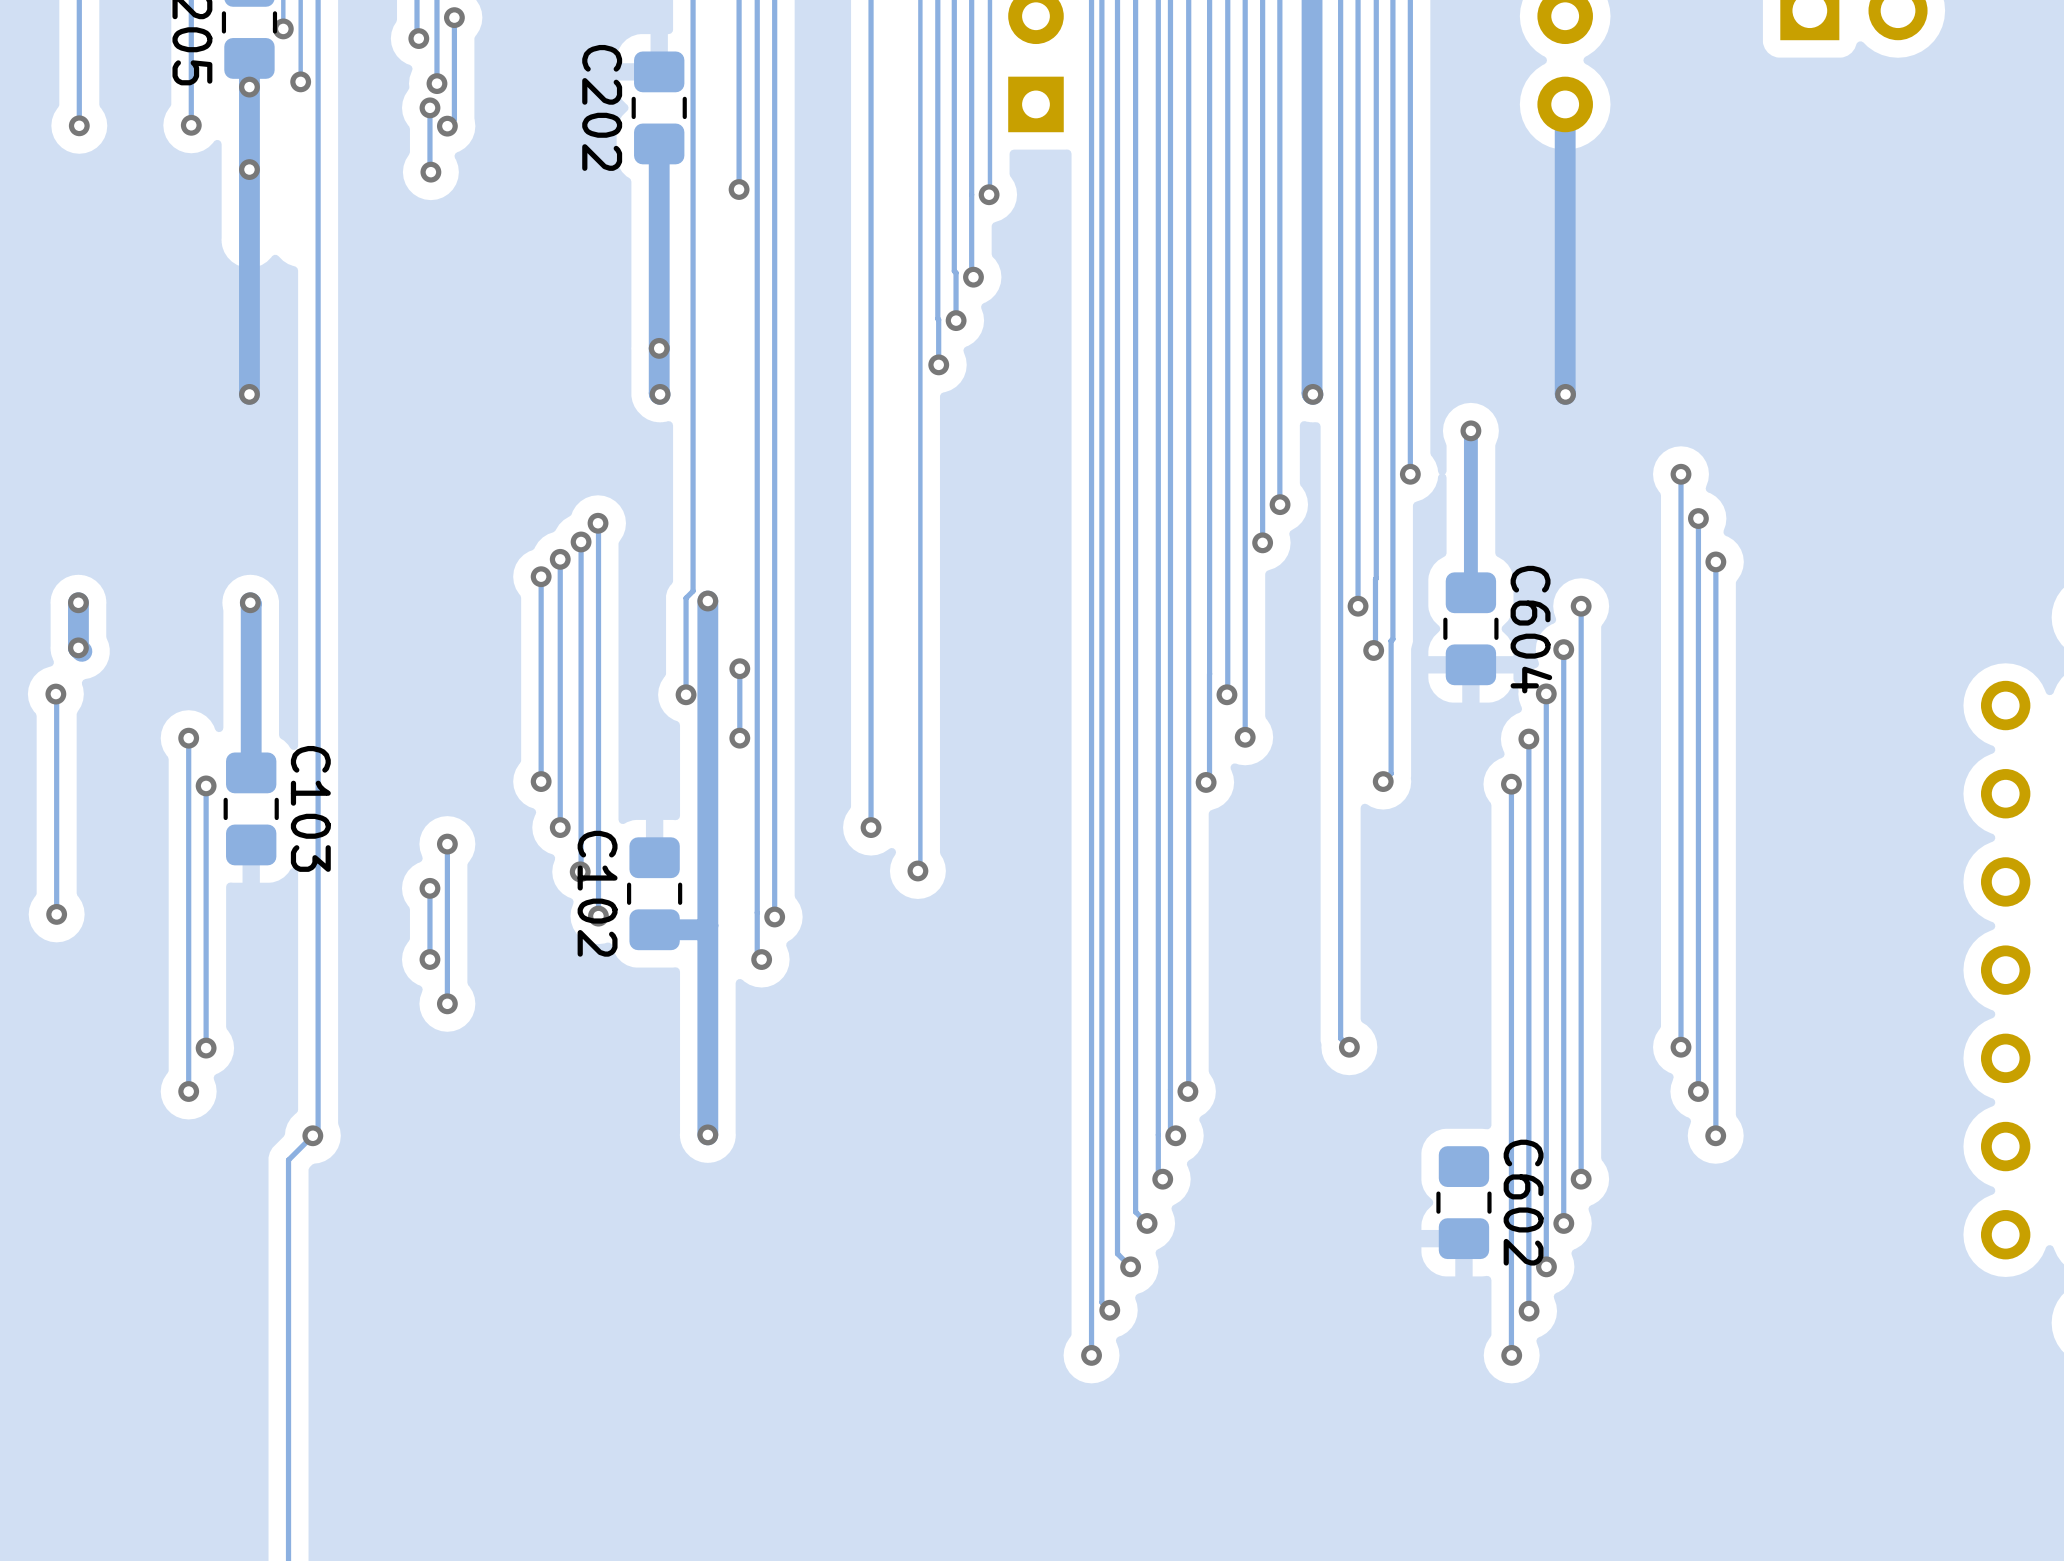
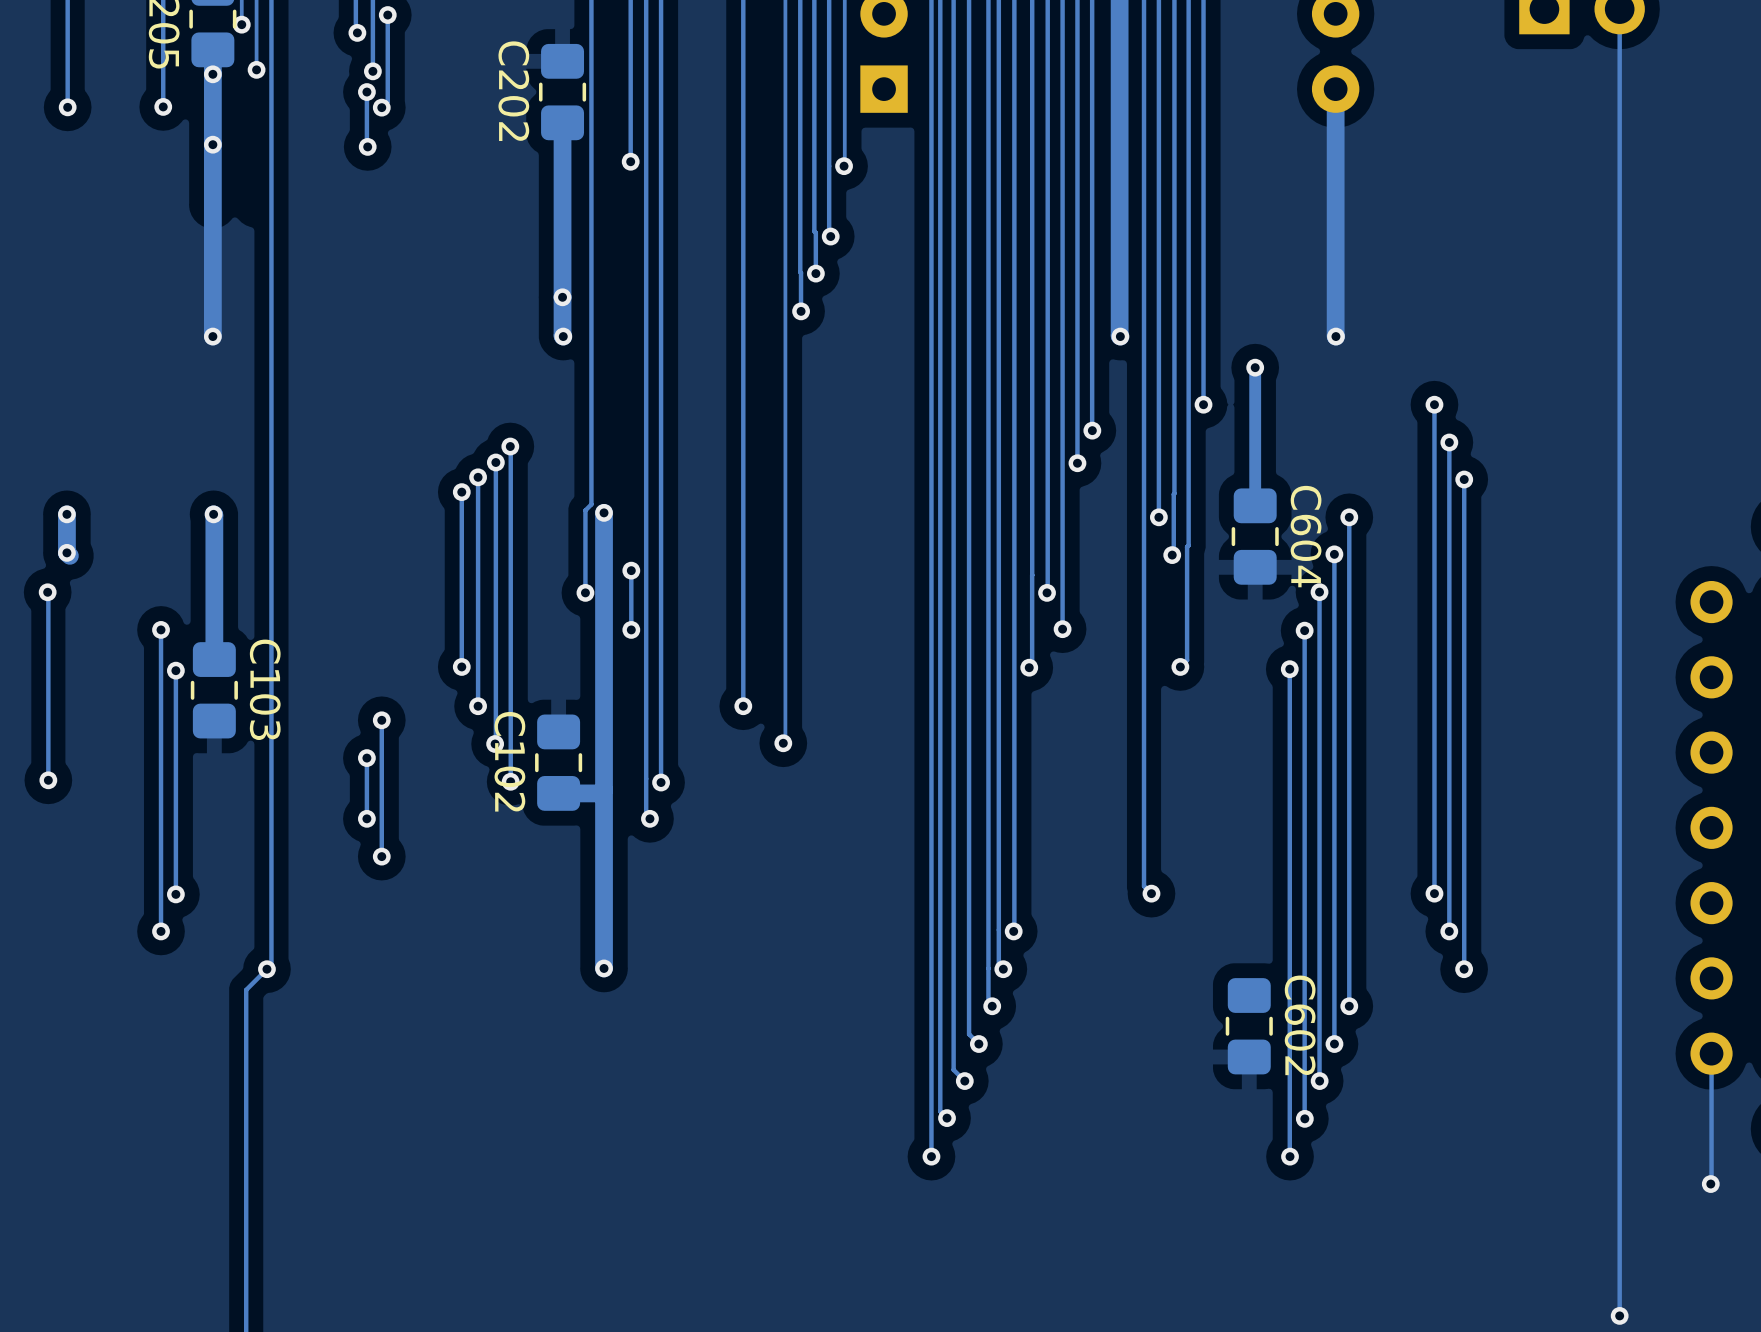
track: none -> (1619, 9) (1619, 1315)
track: none -> (1711, 1053) (1710, 1184)
via: none -> (1710, 1184)
via: none -> (1619, 1315)

